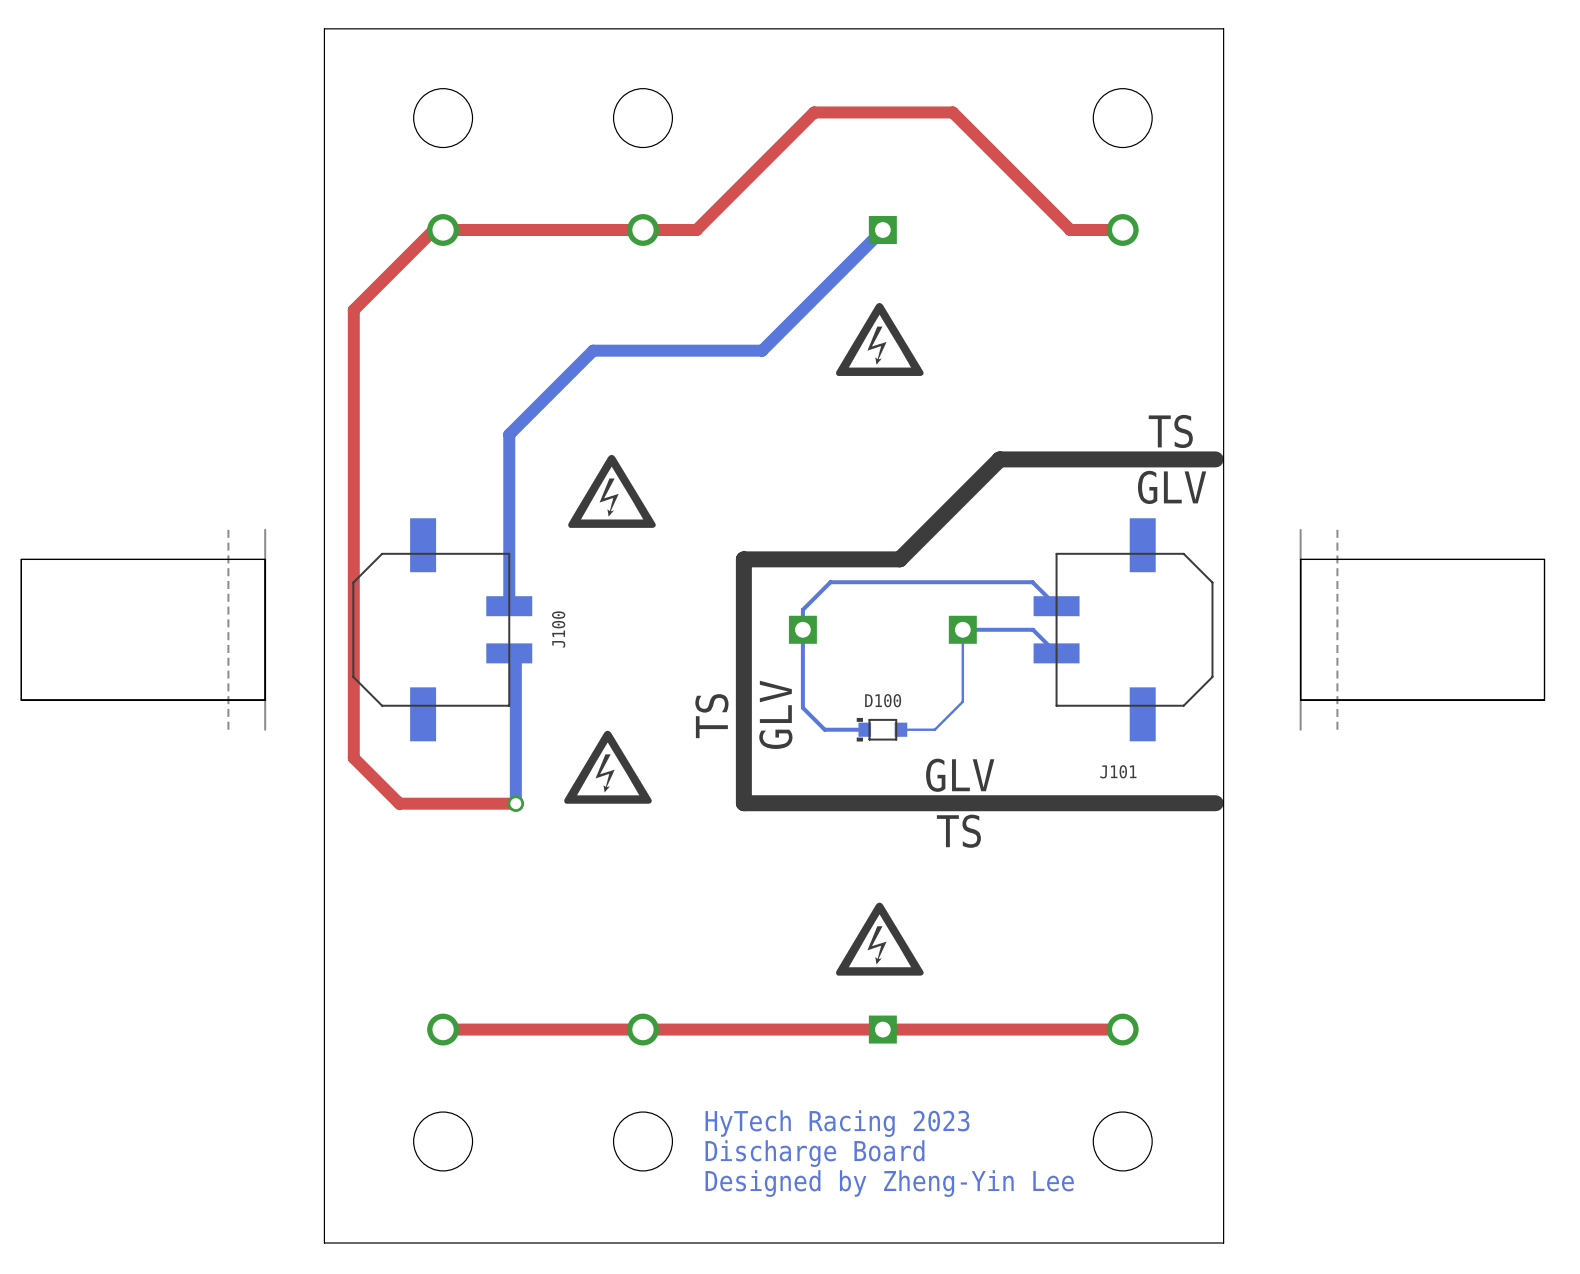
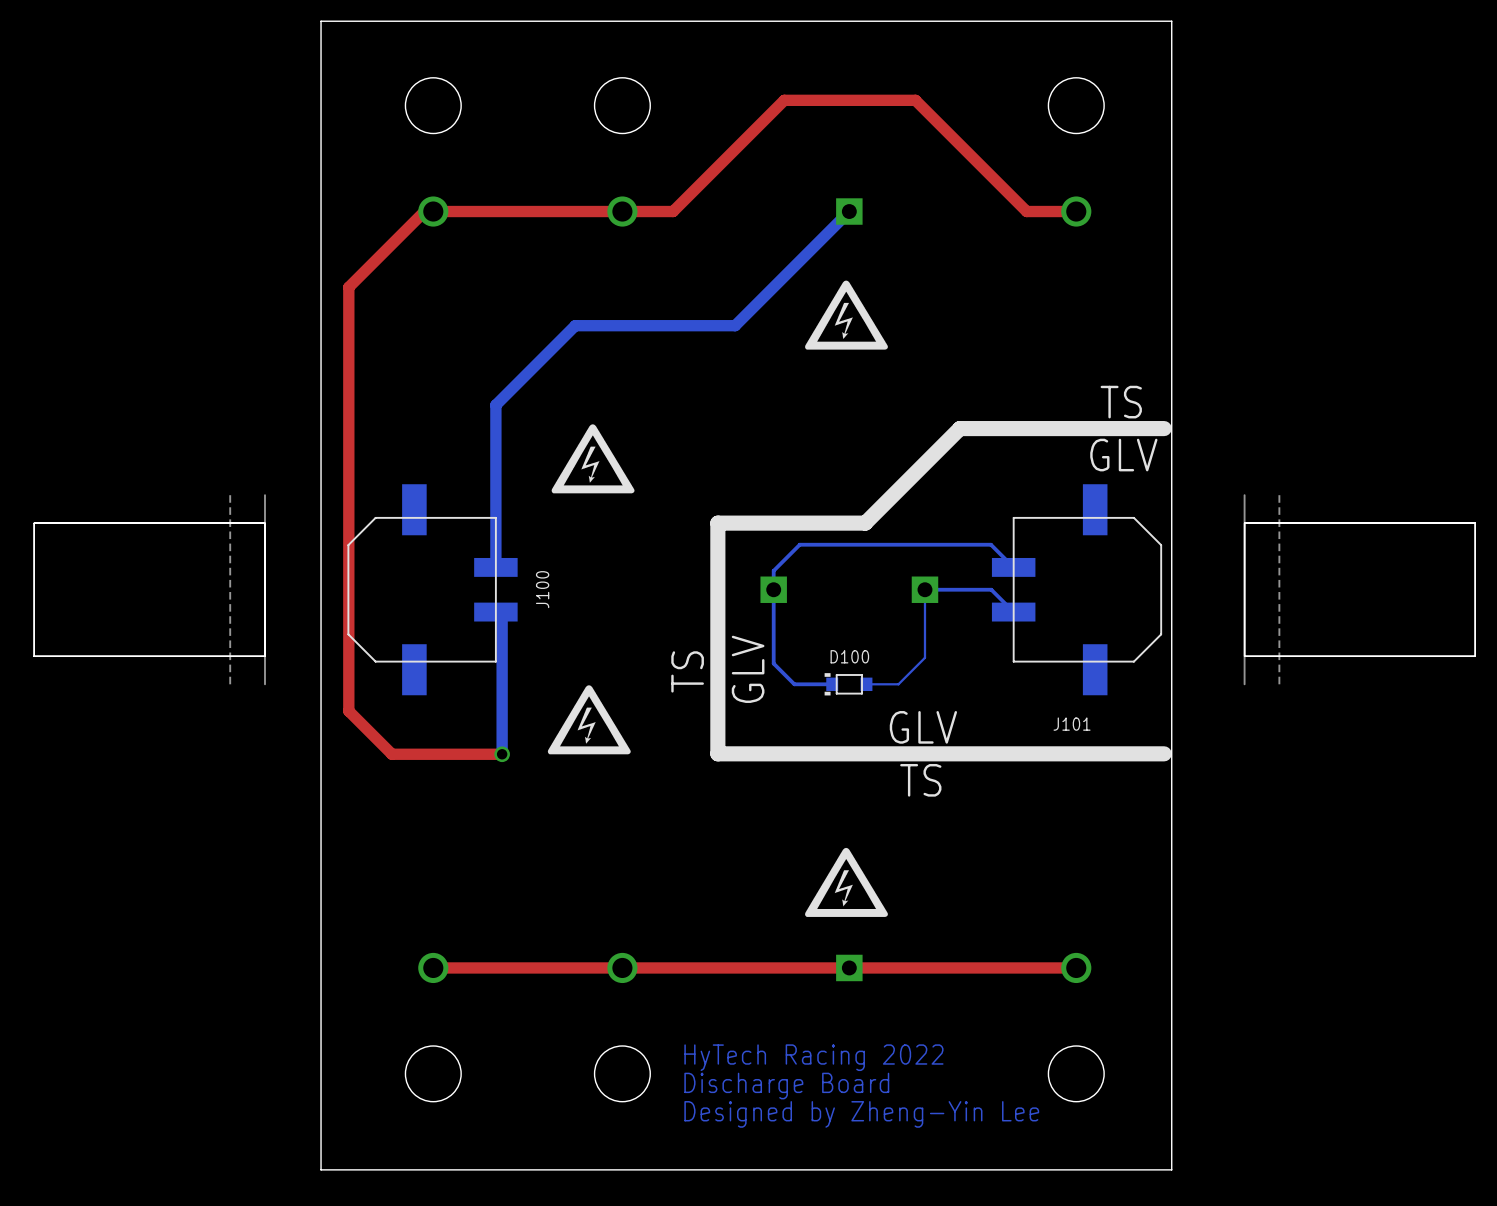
text: HyTech Racing 2023 (837, 1123) -> HyTech Racing 2022 (813, 1057)

